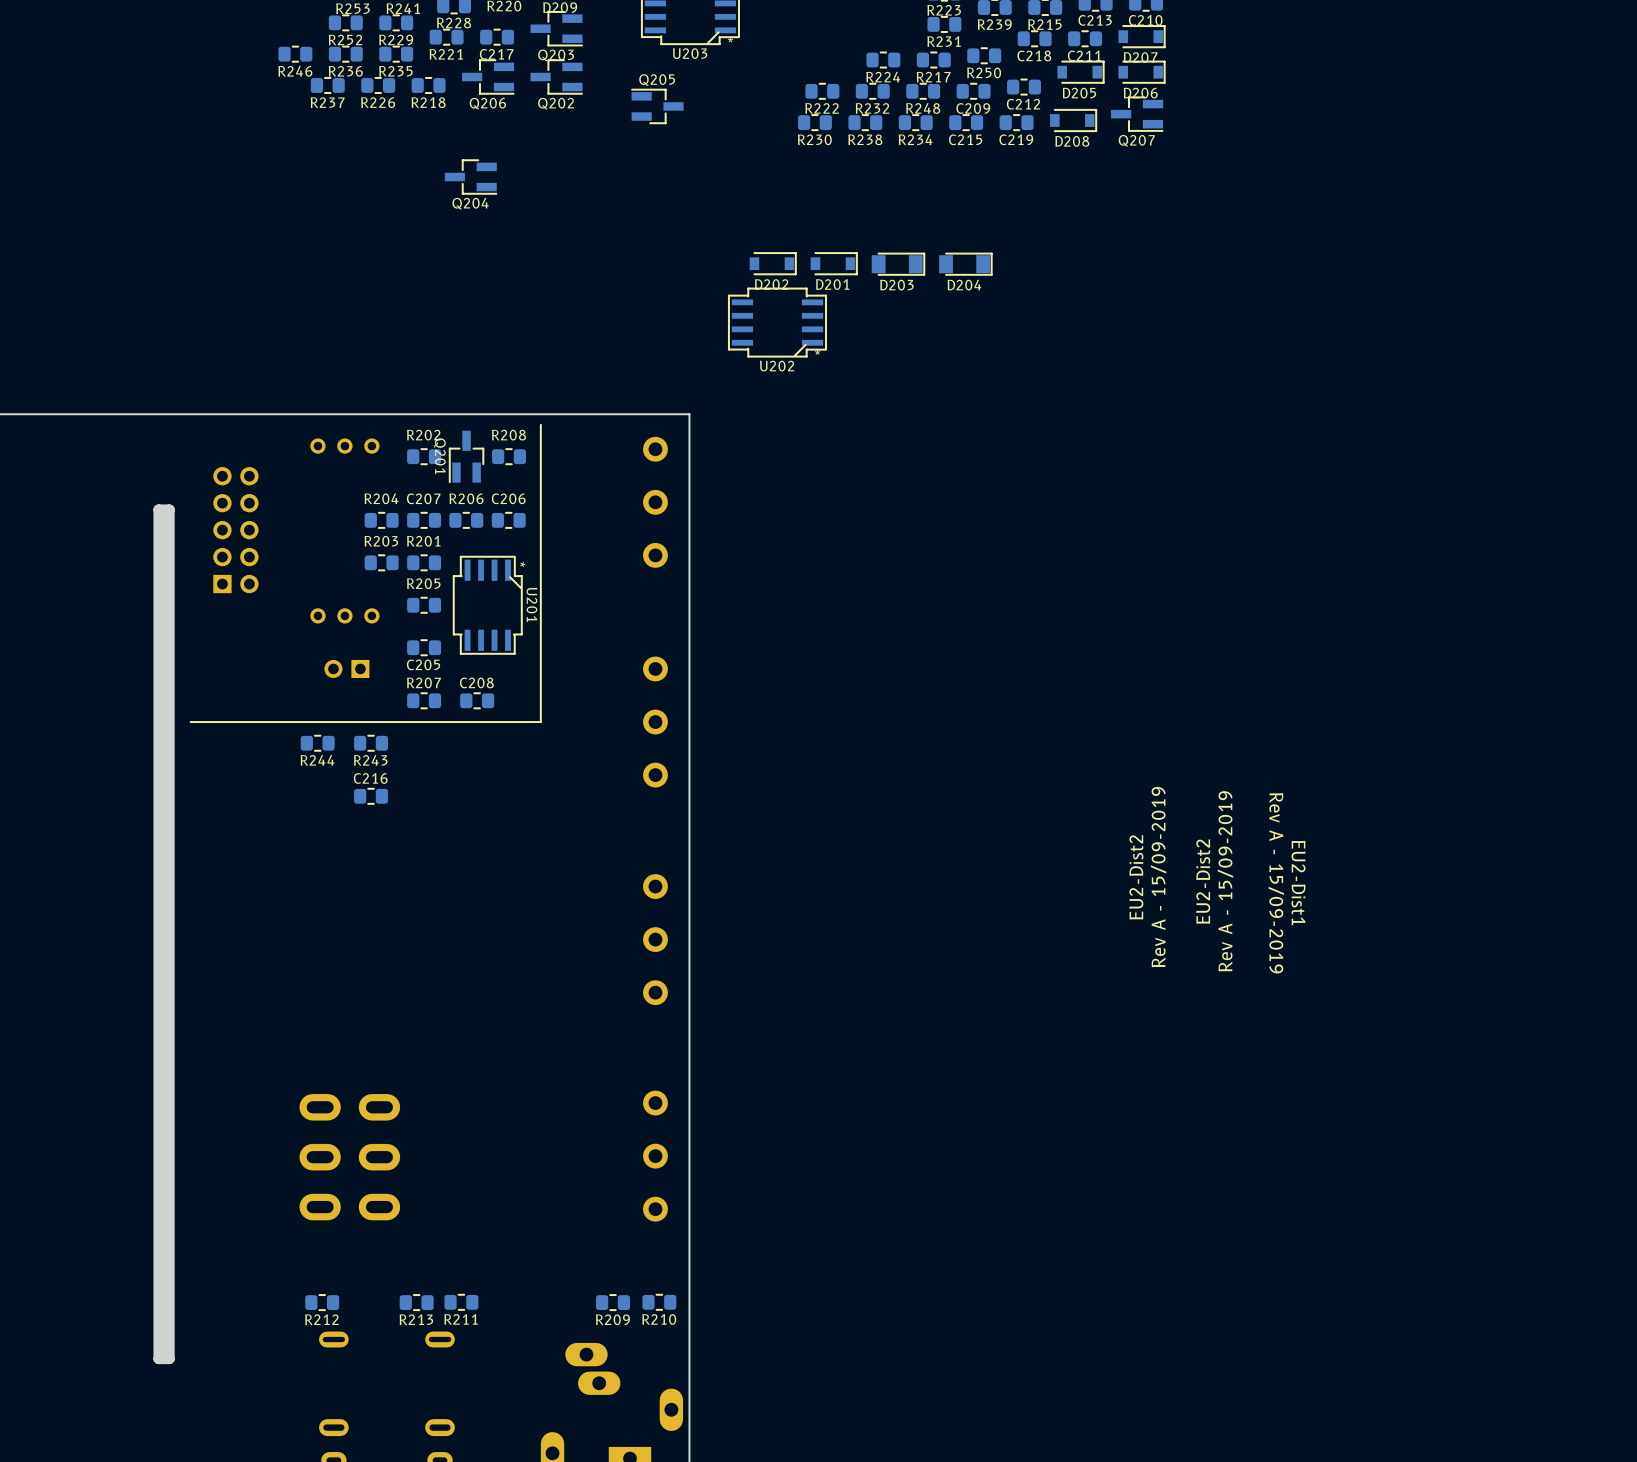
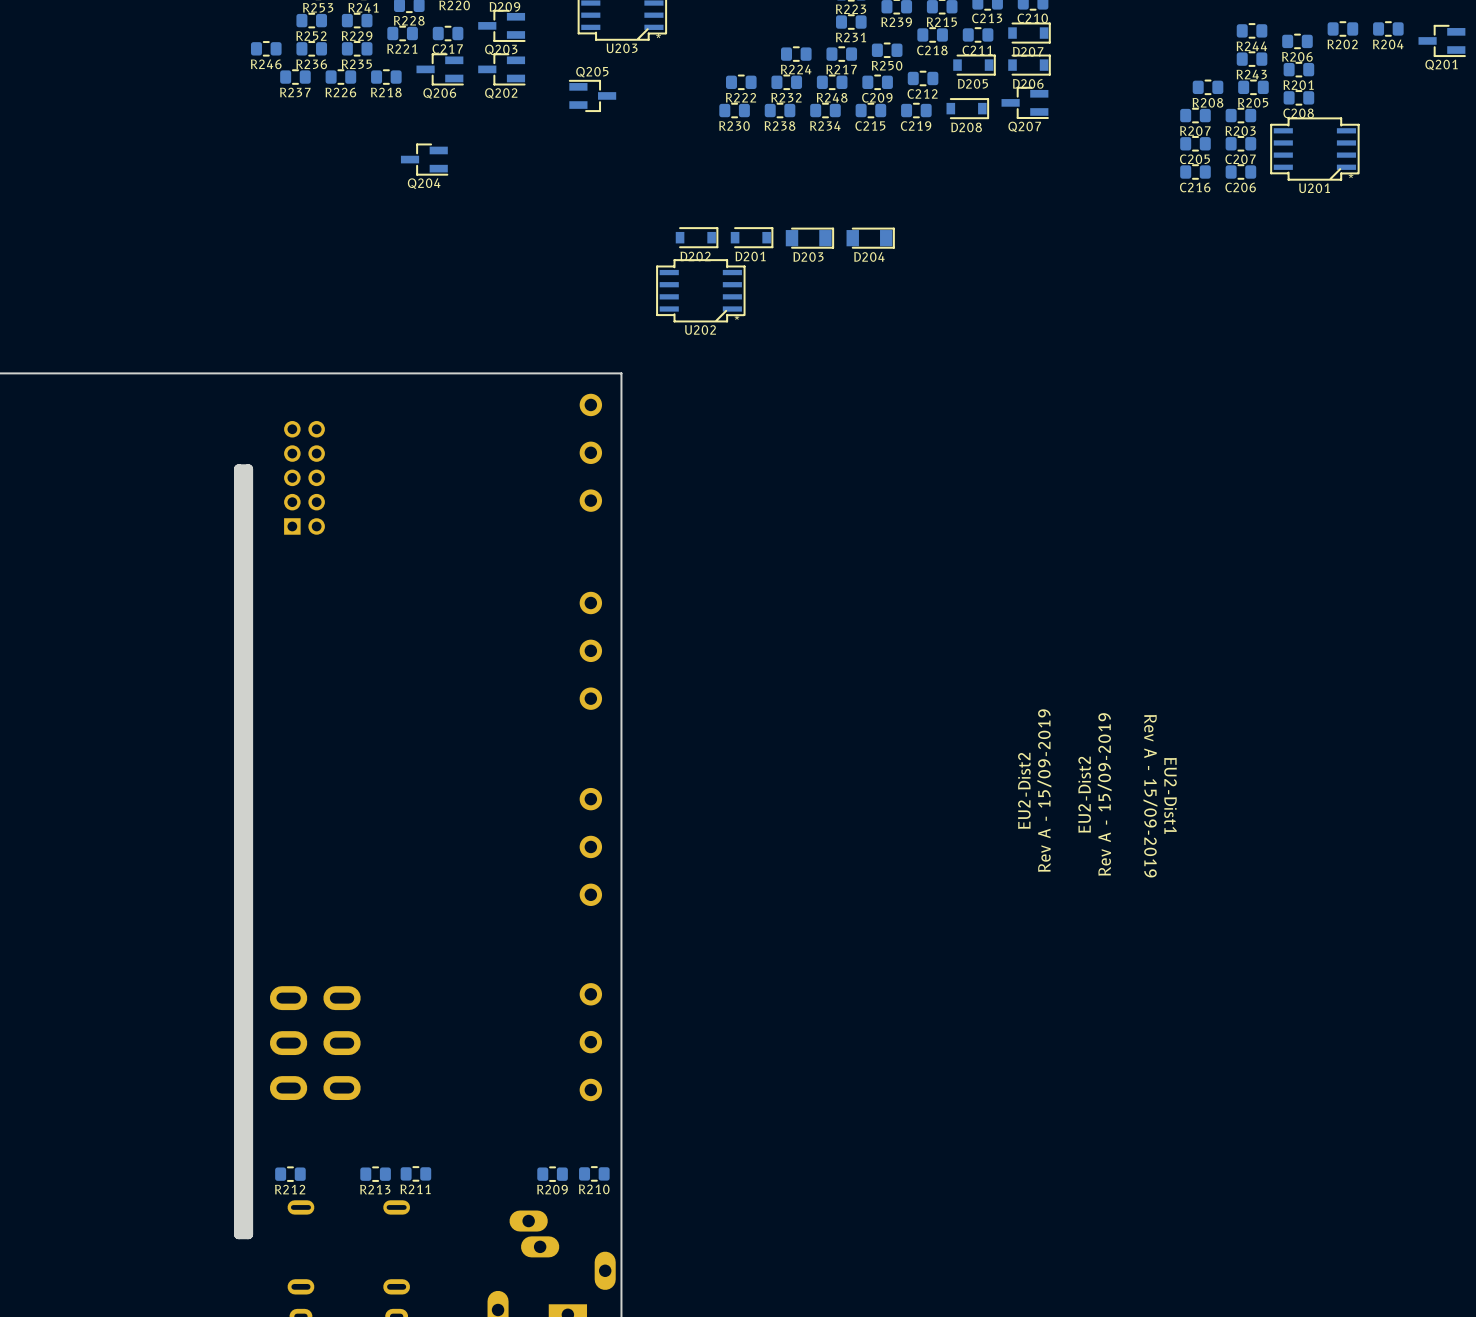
line: (540, 424) (540, 722) (190, 722) -> none
R202 name position: R202 (423, 435) -> R202 (1342, 44)
R208 name position: R208 (508, 435) -> R208 (1207, 102)
part: (344, 446) -> none
R202 position: (424, 456) -> (1342, 28)
Q201 rotation: 0° (466, 456) -> 90° counterclockwise (1441, 40)
Q201 position: (466, 456) -> (1441, 40)
R208 position: (509, 456) -> (1208, 87)
R204 name position: R204 (381, 498) -> R204 (1388, 44)
C207 name position: C207 (423, 498) -> C207 (1240, 159)
R206 name position: R206 (466, 498) -> R206 (1297, 56)
C206 name position: C206 (508, 498) -> C206 (1240, 187)
board edge: (169, 509) (158, 509) (158, 1358) (169, 1358) (169, 509) -> (248, 469) (238, 469) (238, 1234) (248, 1234) (248, 469)
R204 position: (381, 520) -> (1388, 28)
C207 position: (424, 520) -> (1240, 143)
R206 position: (466, 520) -> (1297, 41)
C206 position: (508, 520) -> (1240, 172)
part position: (235, 530) -> (304, 477)
R203 name position: R203 (381, 541) -> R203 (1240, 131)
R201 name position: R201 (423, 541) -> R201 (1298, 85)
R203 position: (381, 562) -> (1240, 115)
R201 position: (424, 562) -> (1298, 69)
R205 name position: R205 (423, 583) -> R205 (1253, 102)
R205 position: (424, 605) -> (1253, 87)
U201 rotation: 0° (487, 605) -> 90° clockwise (1314, 149)
U201 position: (487, 605) -> (1314, 149)
part: (344, 615) -> none
C205 position: (424, 647) -> (1195, 143)
part: (346, 668) -> none
R207 name position: R207 (423, 682) -> R207 (1195, 131)
C208 name position: C208 (476, 682) -> C208 (1298, 113)
R207 position: (424, 700) -> (1195, 115)
C208 position: (477, 700) -> (1298, 97)
R244 position: (317, 743) -> (1252, 30)
R243 position: (371, 743) -> (1252, 59)
C216 name position: C216 (370, 778) -> C216 (1195, 187)
C216 position: (371, 796) -> (1195, 172)

